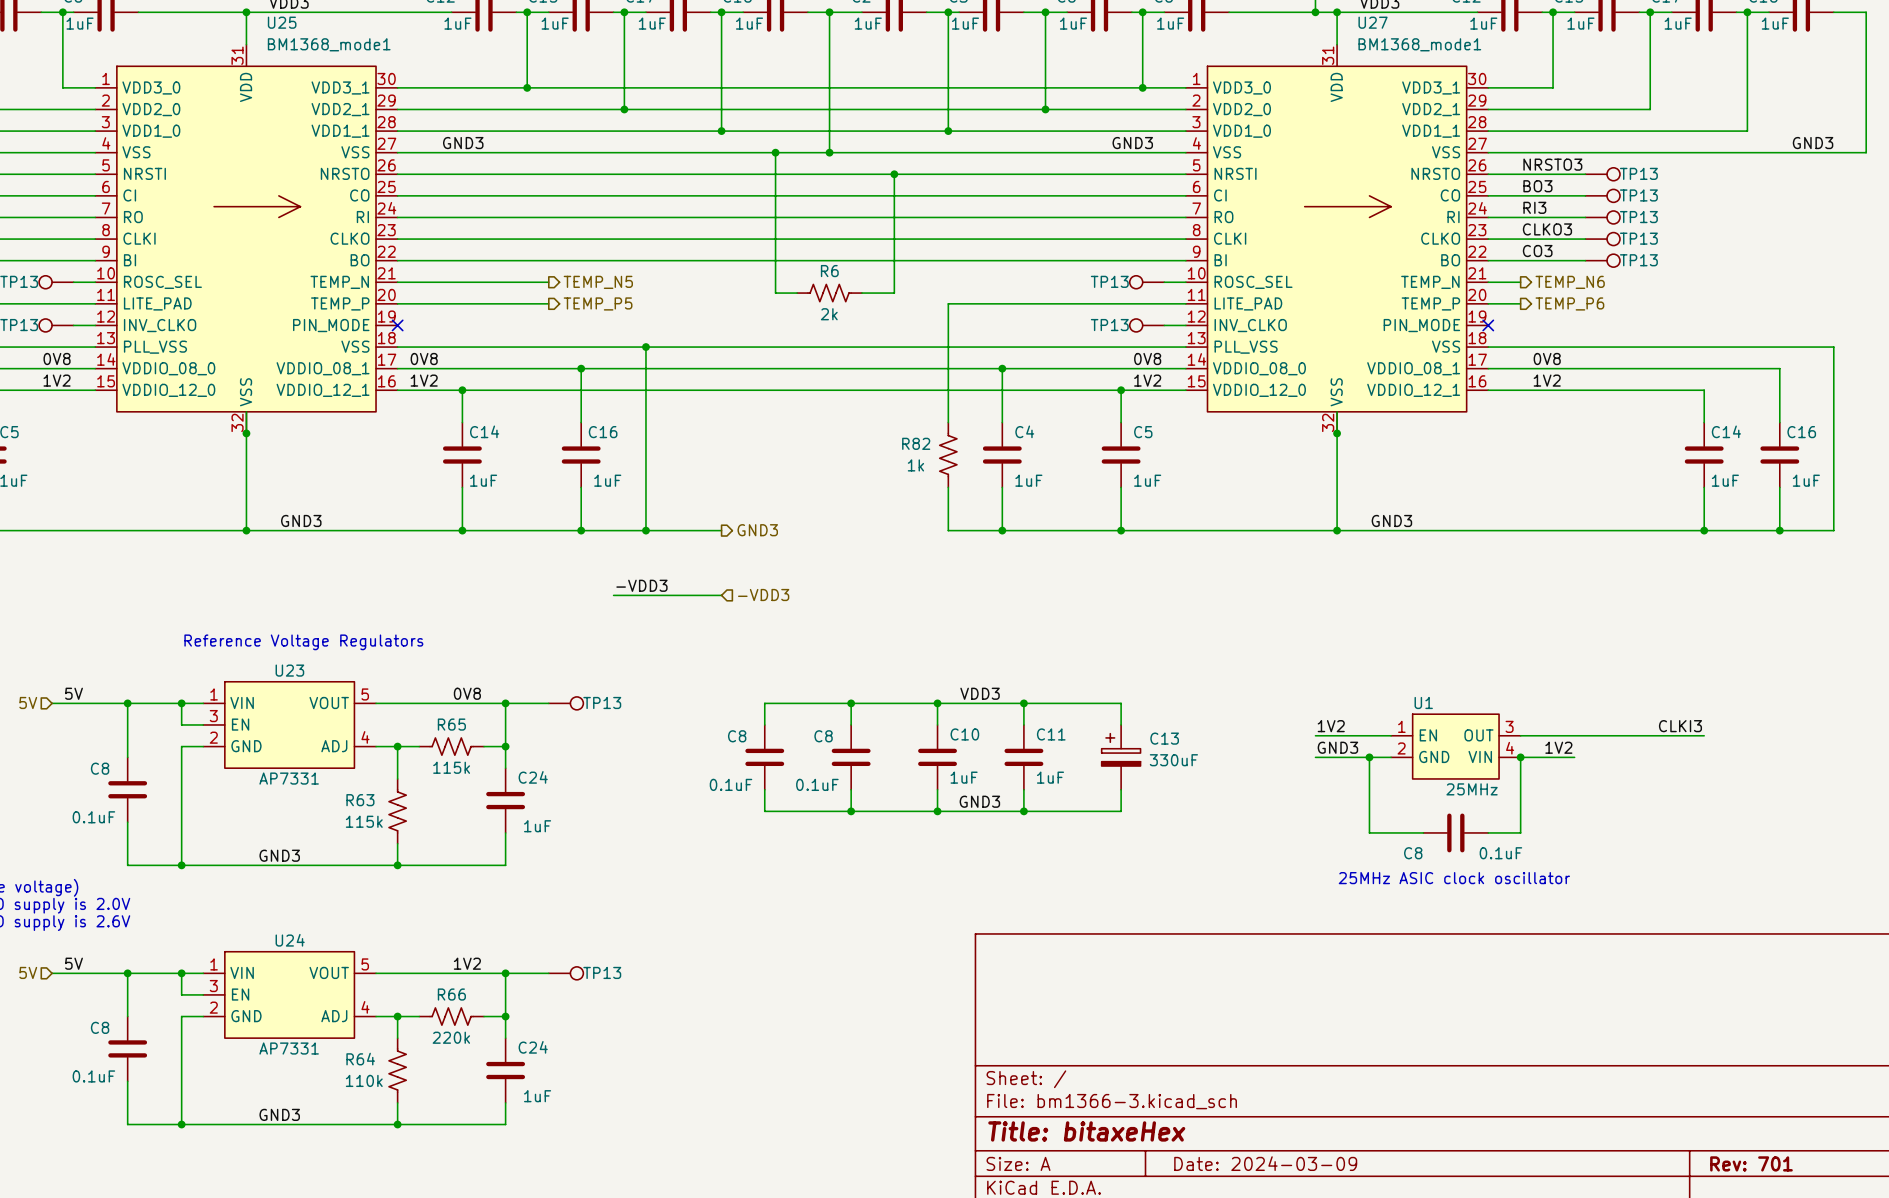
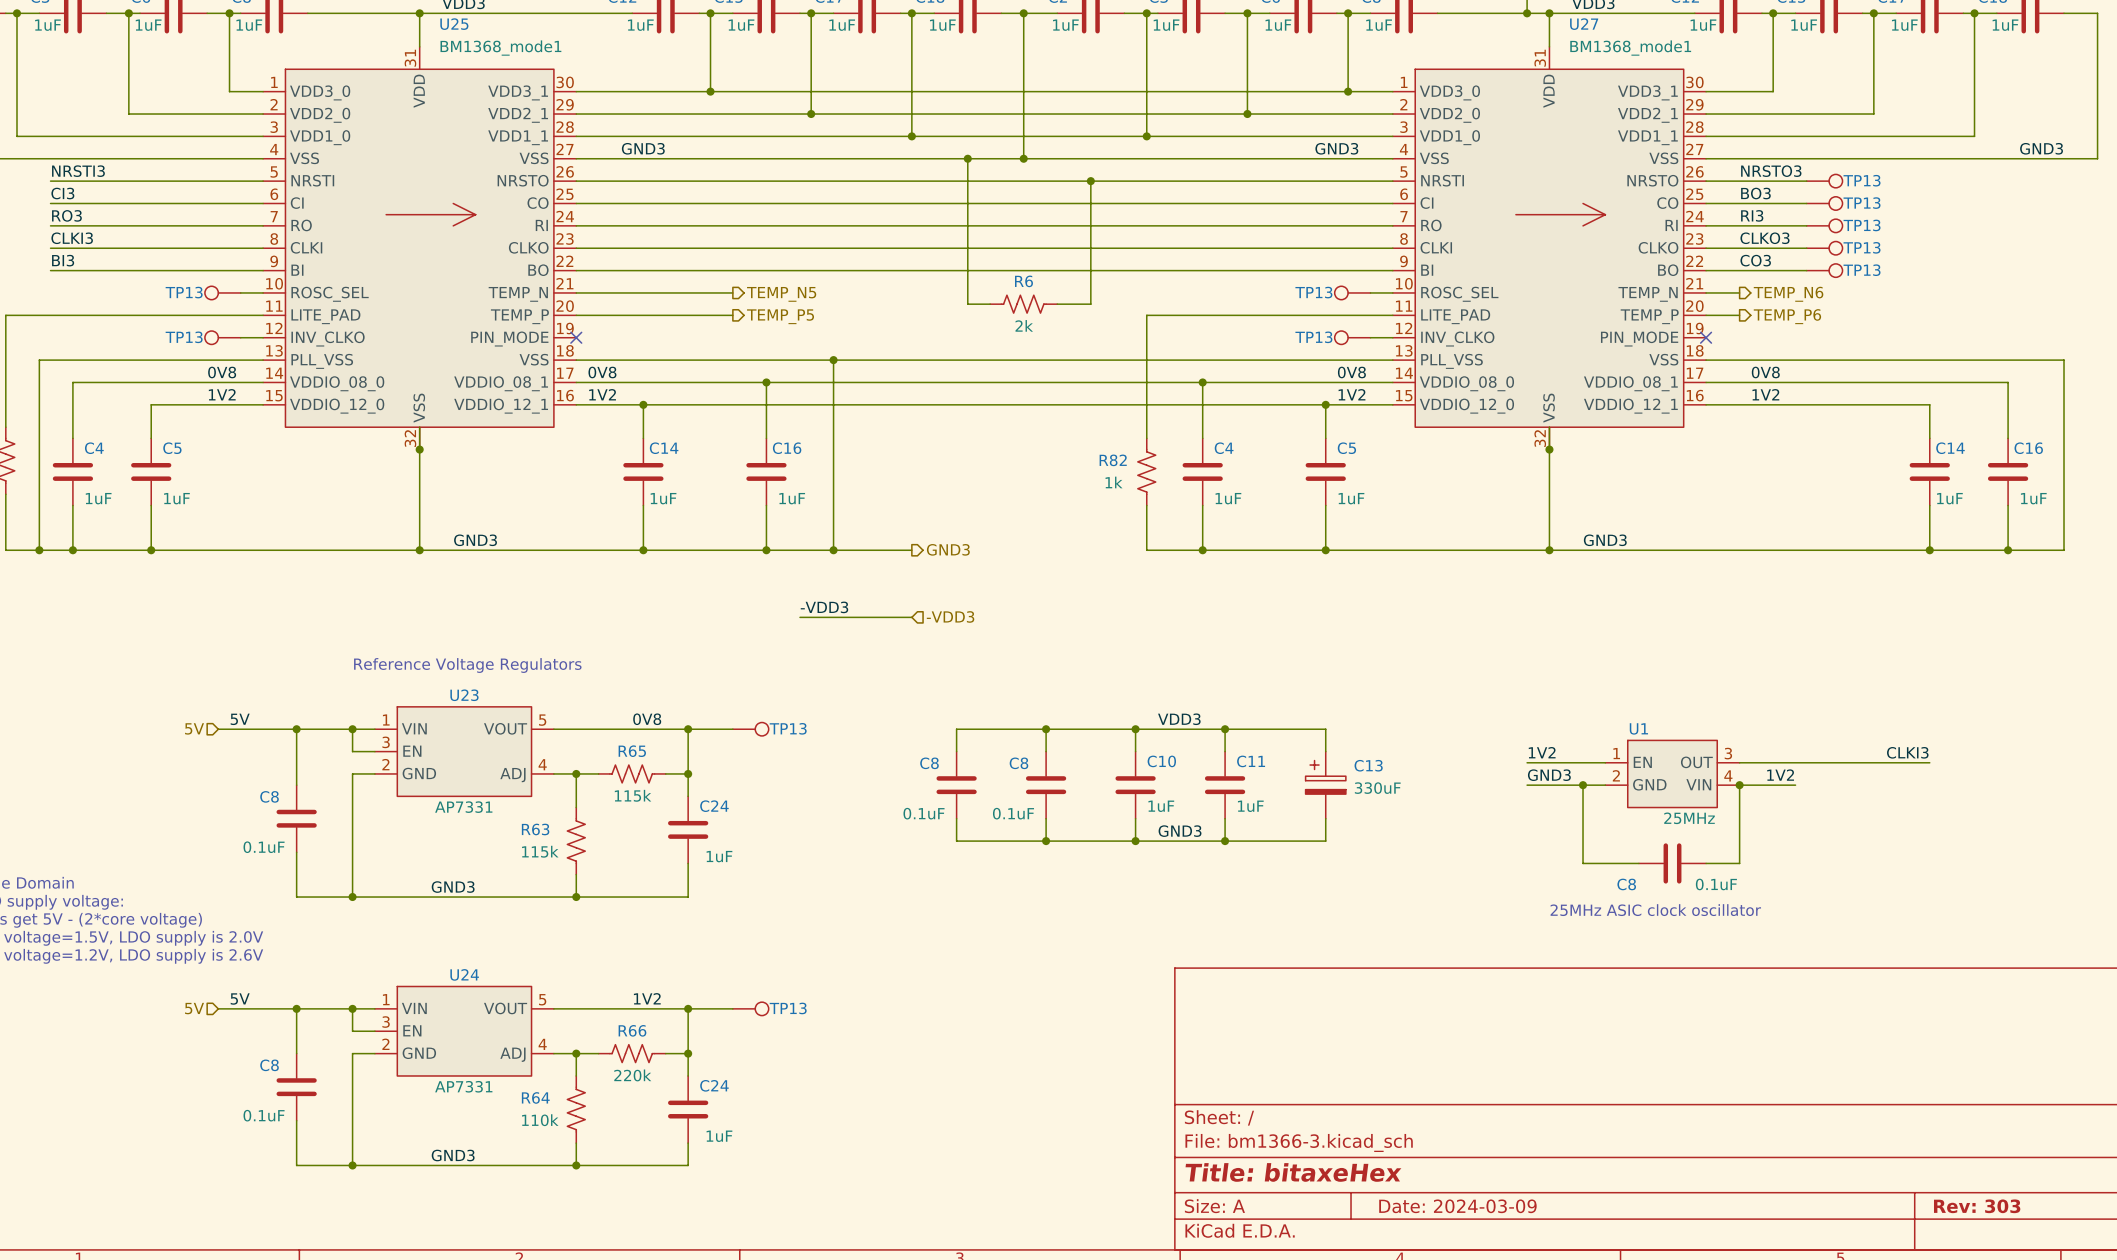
title block: Rev: 701 (1751, 1163) -> Rev: 303 (1977, 1206)

